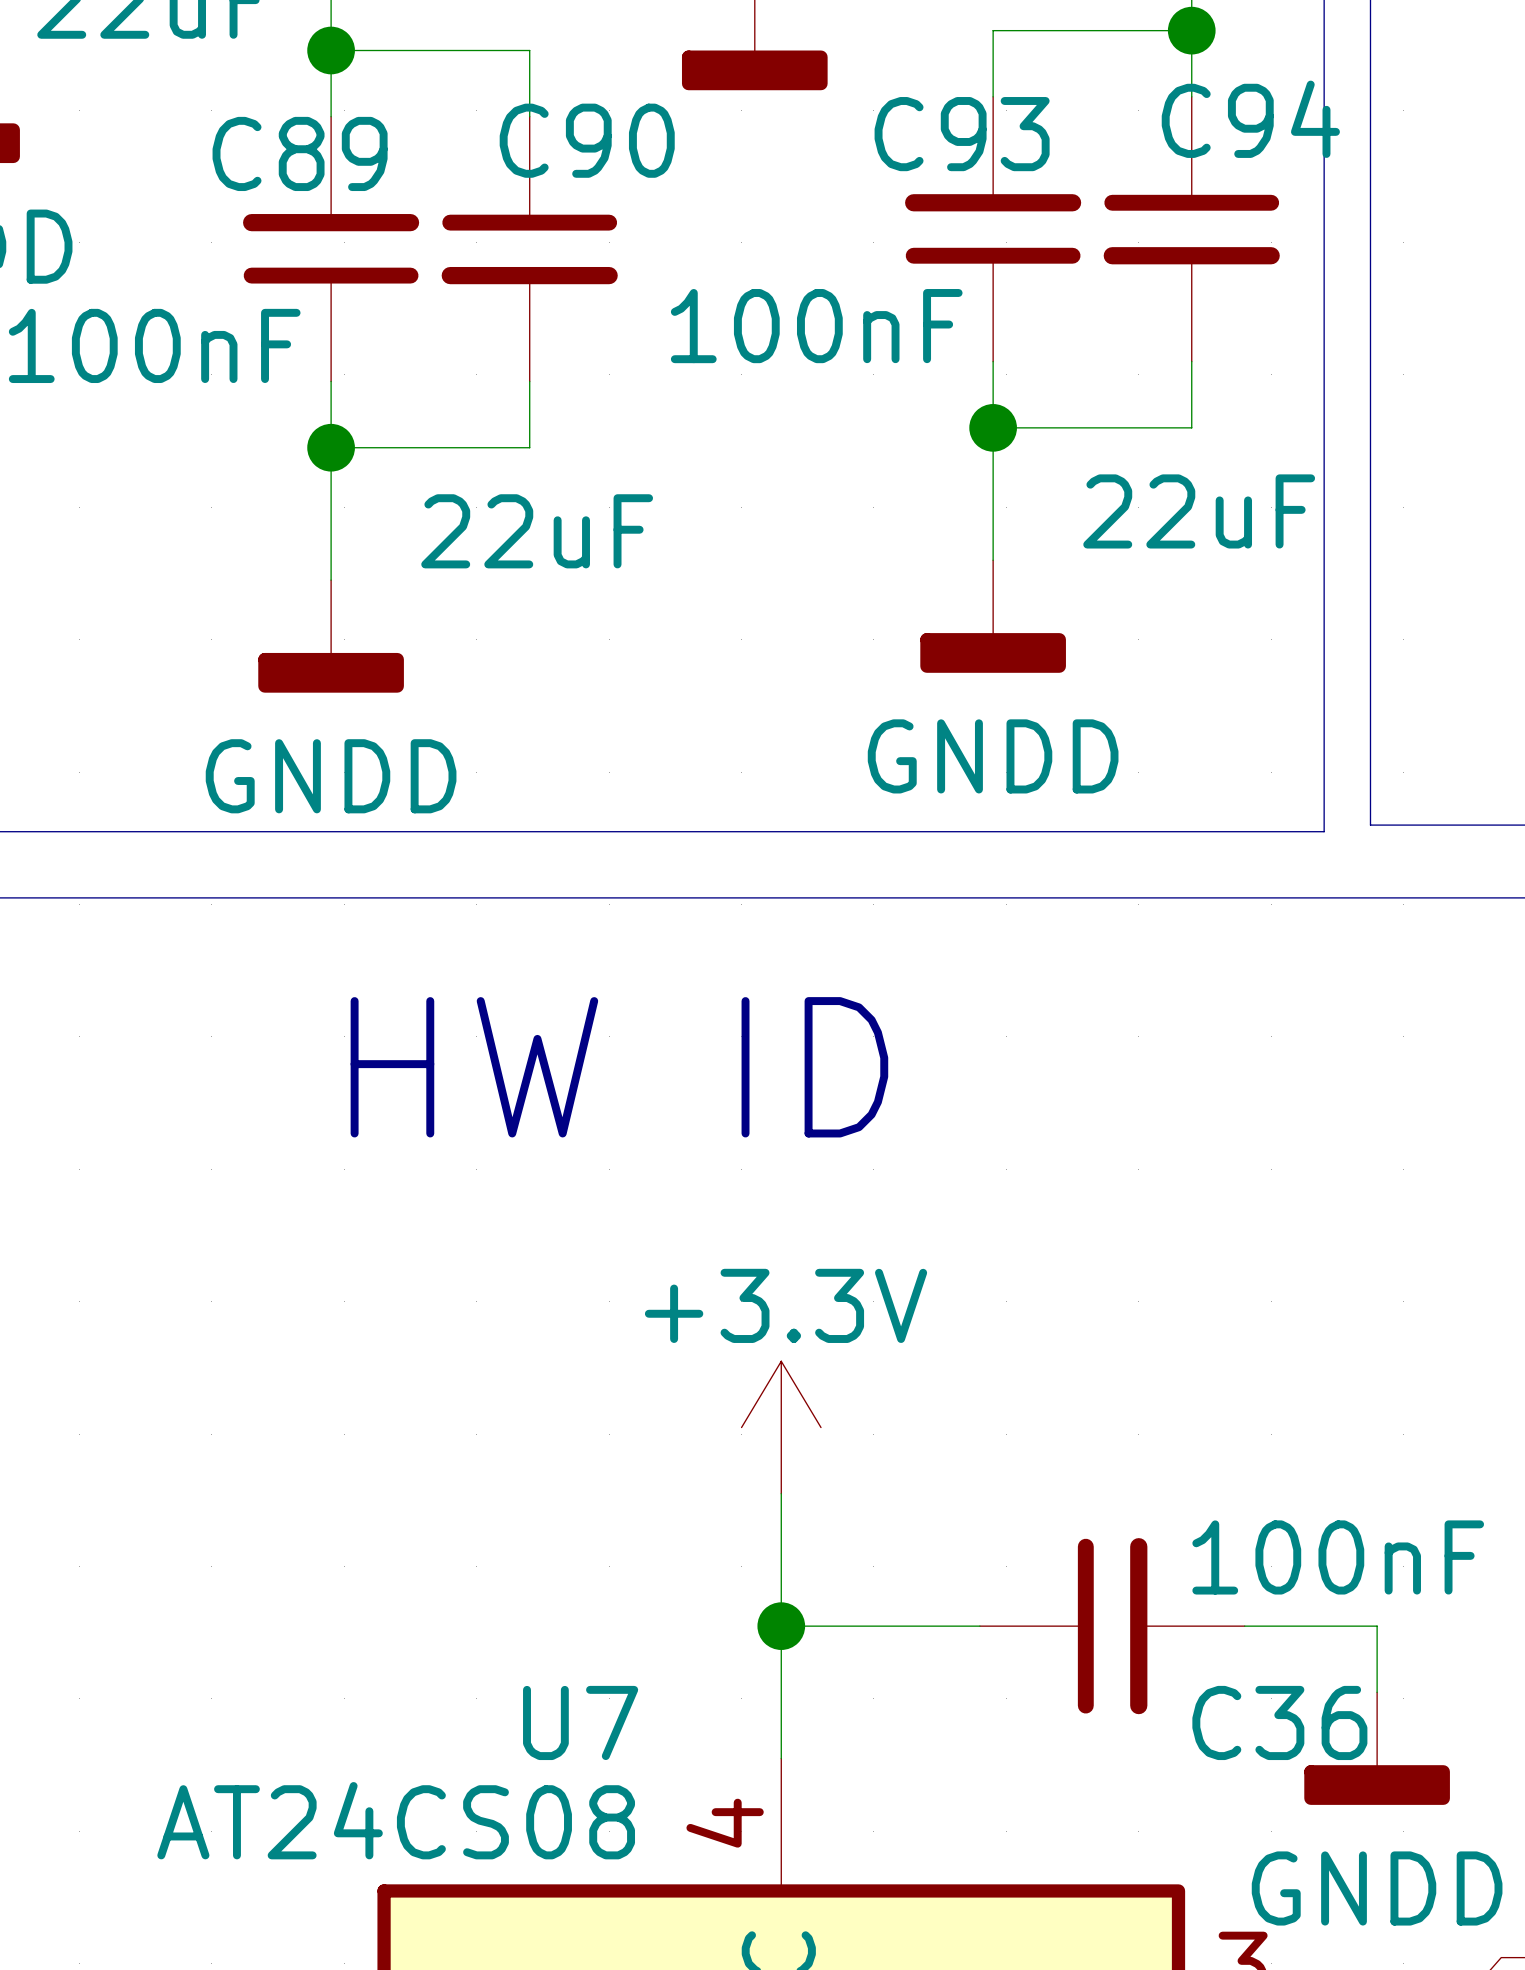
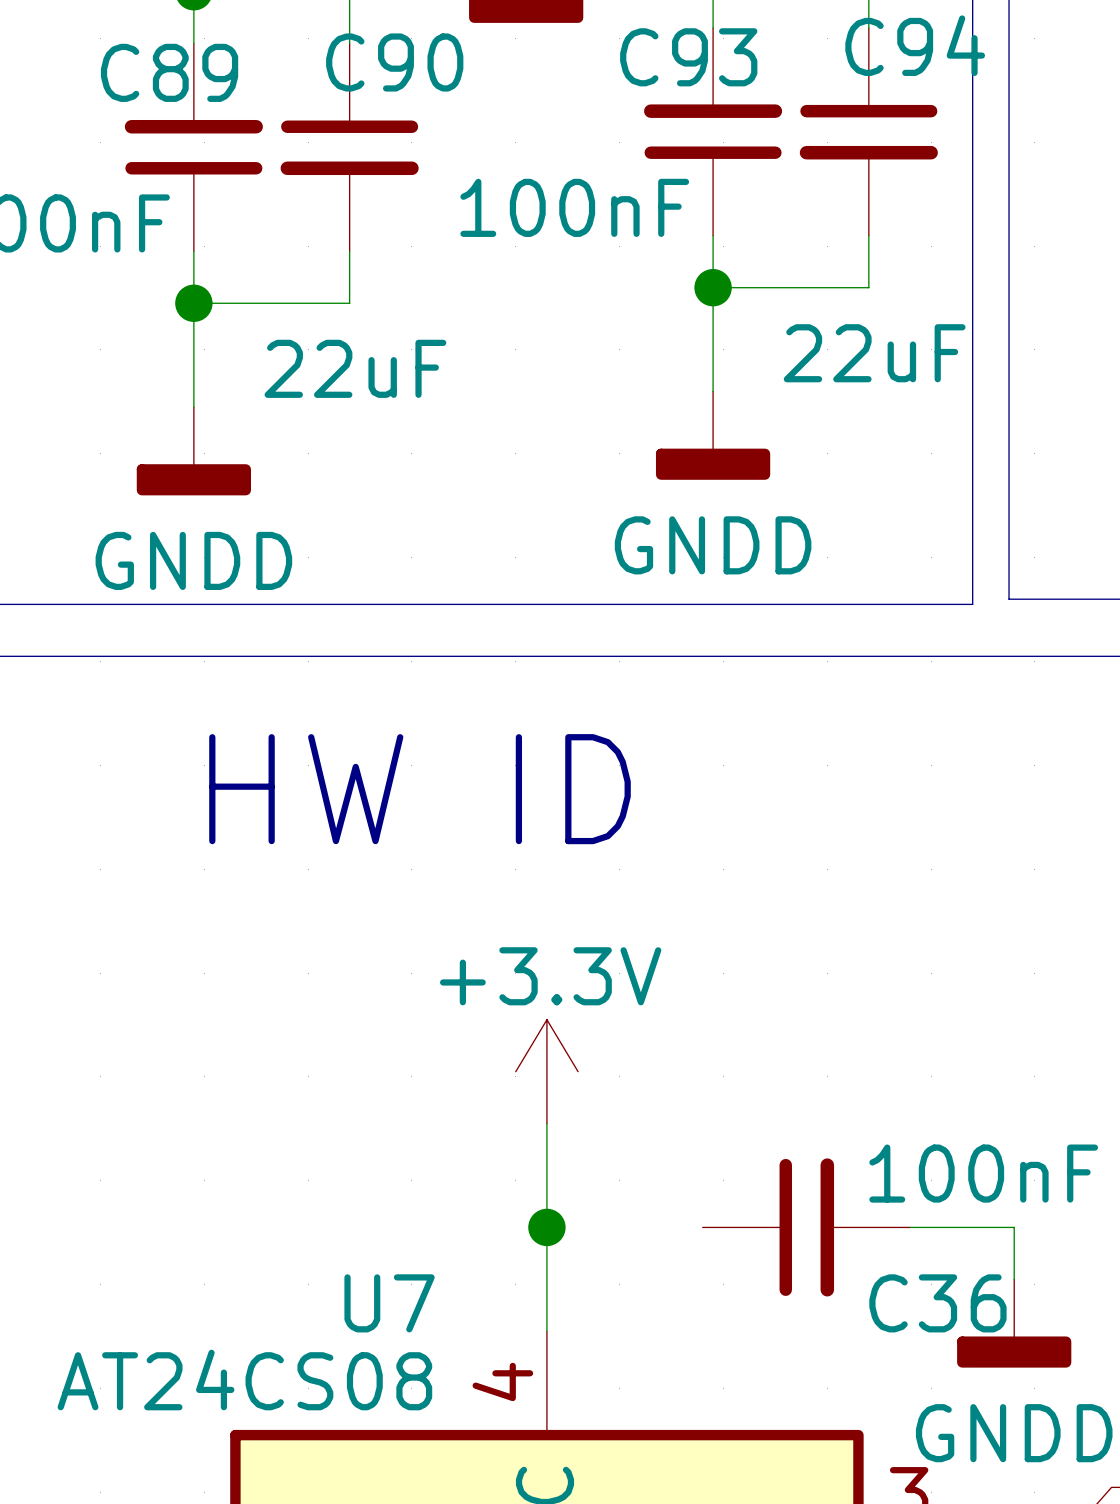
wire: (781, 1626) (979, 1626) -> none

